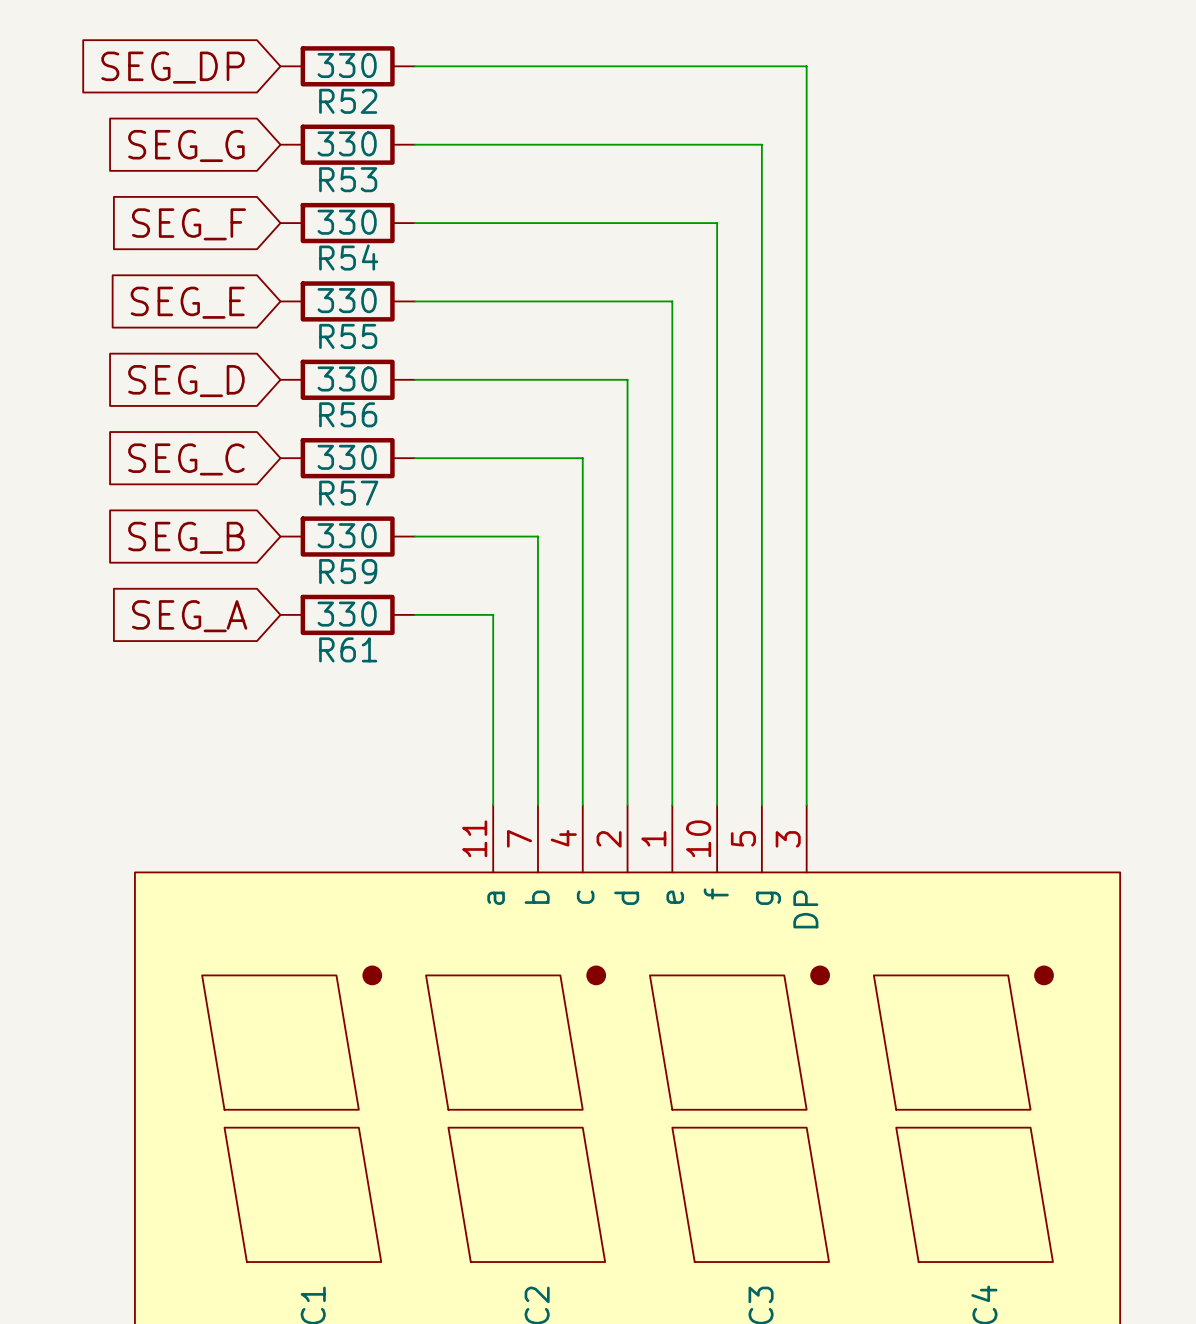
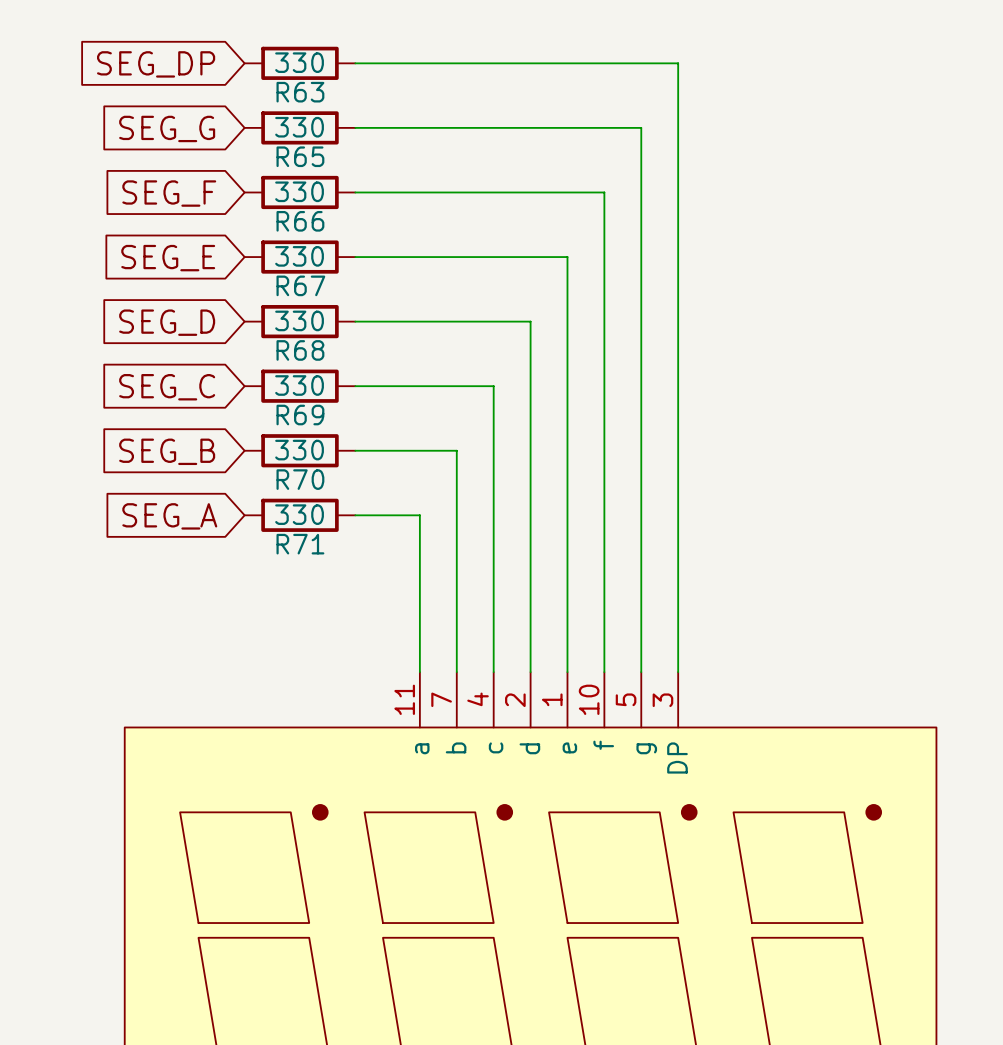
R52 name: R52 (348, 101) -> R63 (300, 92)
R53 name: R53 (348, 179) -> R65 (300, 156)
R54 name: R54 (348, 257) -> R66 (300, 221)
R55 name: R55 (348, 336) -> R67 (300, 285)
R56 name: R56 (348, 414) -> R68 (300, 350)
R57 name: R57 (348, 493) -> R69 (300, 415)
R59 name: R59 (348, 571) -> R70 (300, 479)
R61 name: R61 (348, 649) -> R71 (300, 544)

